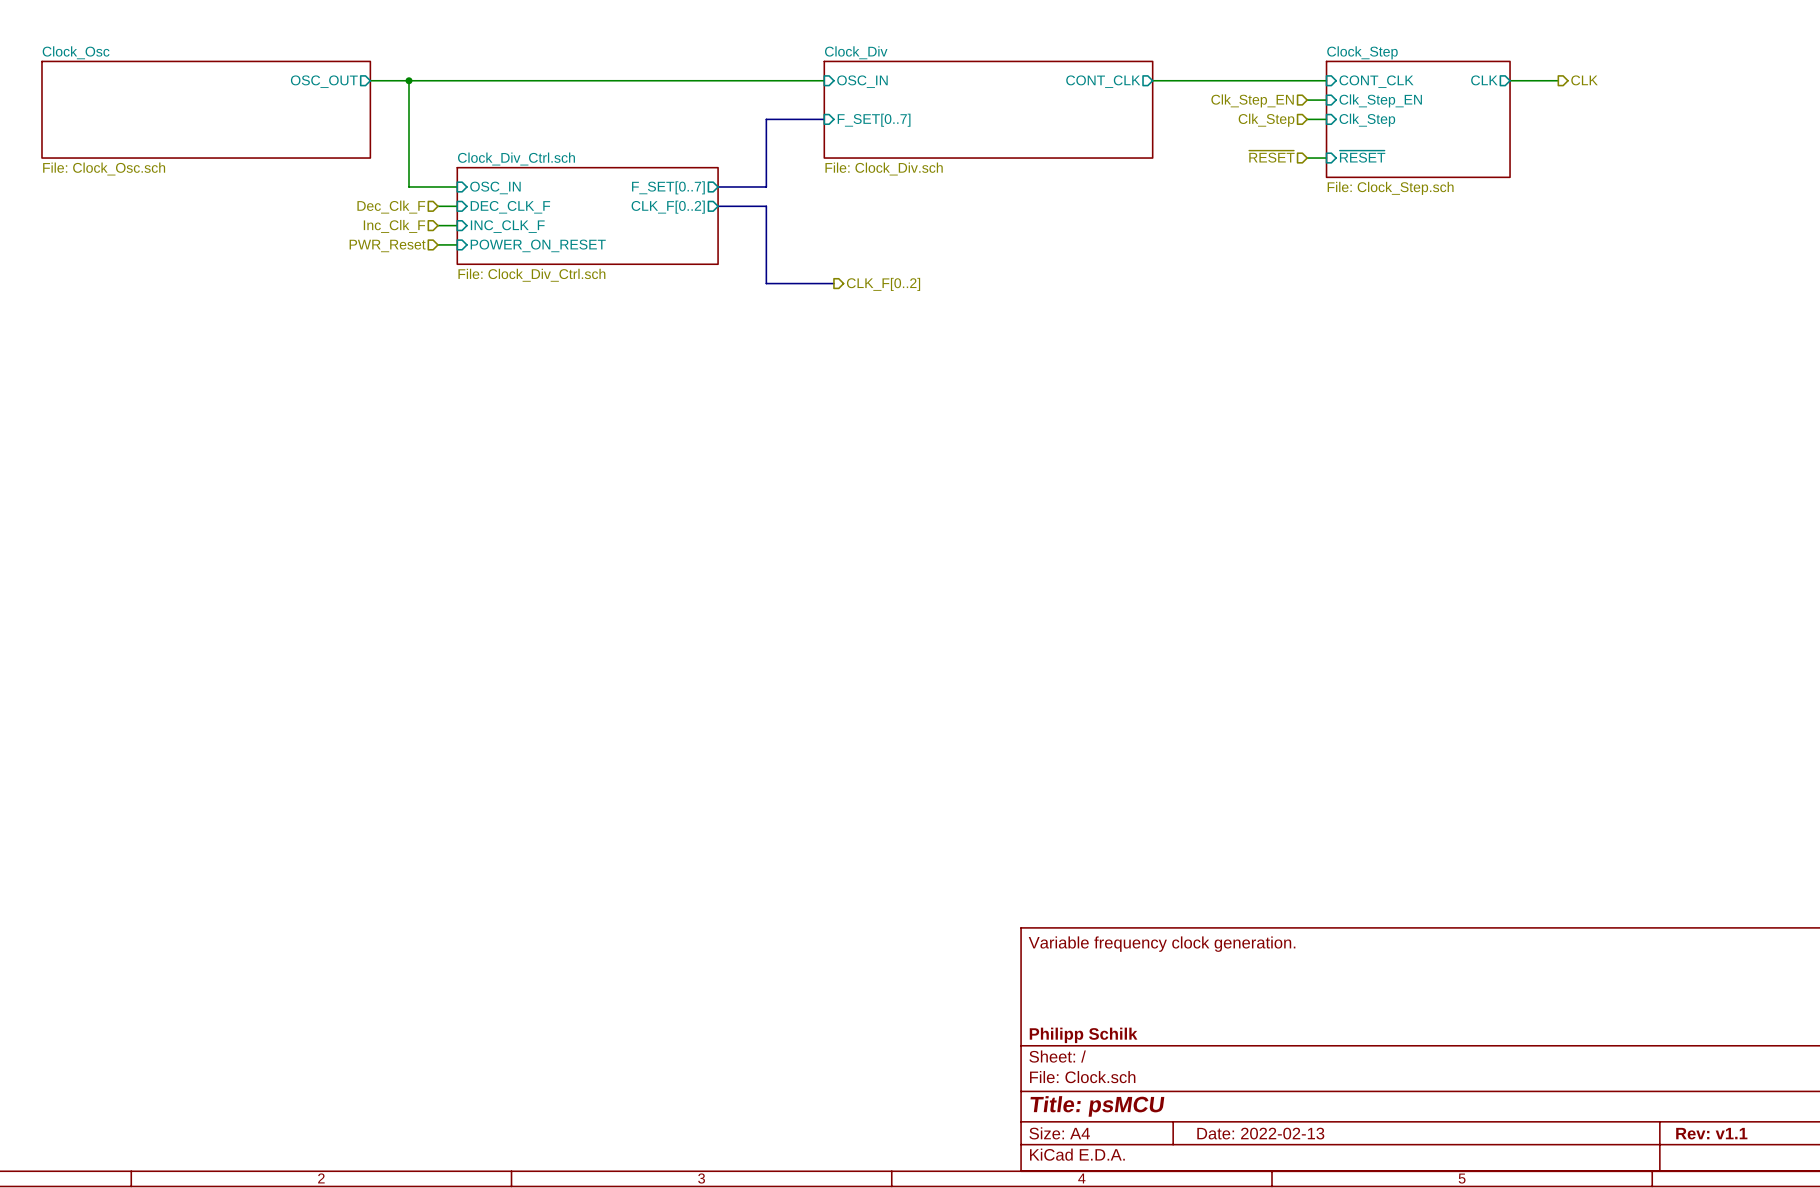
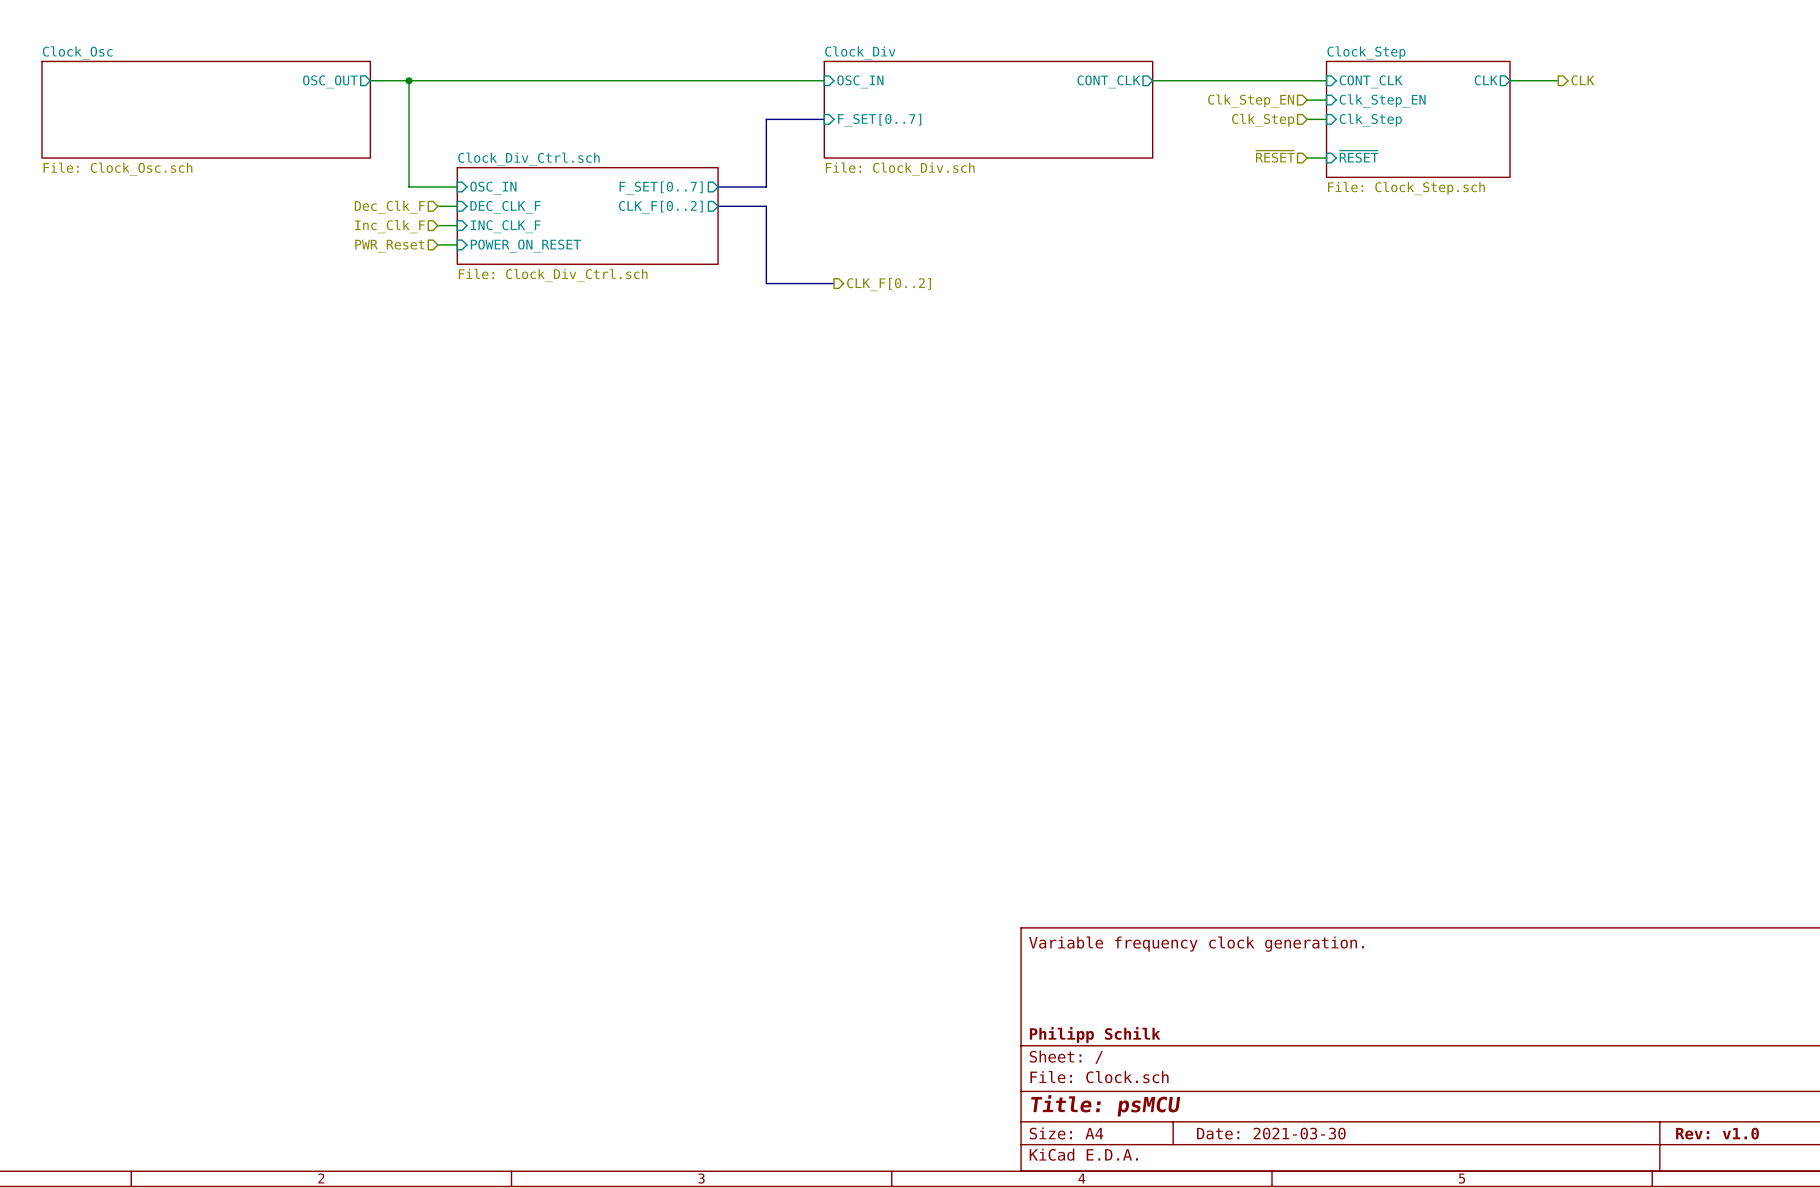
title block: Date: 2022-02-13 (1260, 1133) -> Date: 2021-03-30 (1271, 1133)
title block: Rev: v1.1 (1711, 1133) -> Rev: v1.0 (1717, 1133)

